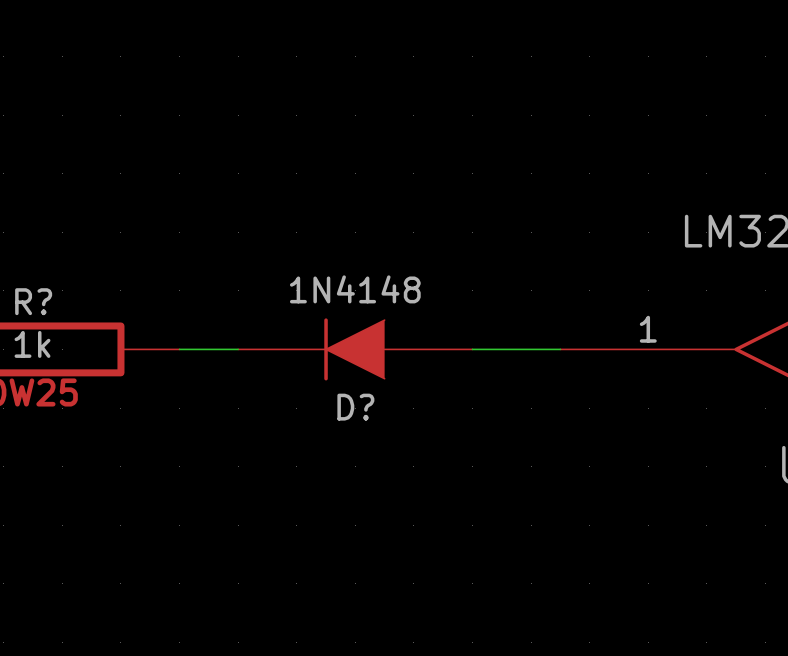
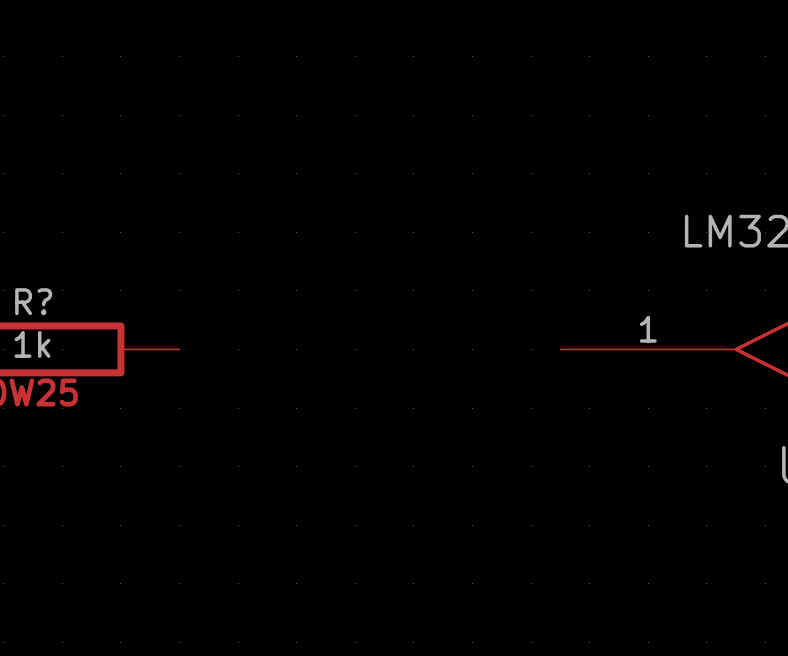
wire: (179, 349) (238, 349) -> none
D?: 1N4148 (355, 349) -> none
wire: (472, 349) (560, 349) -> none

